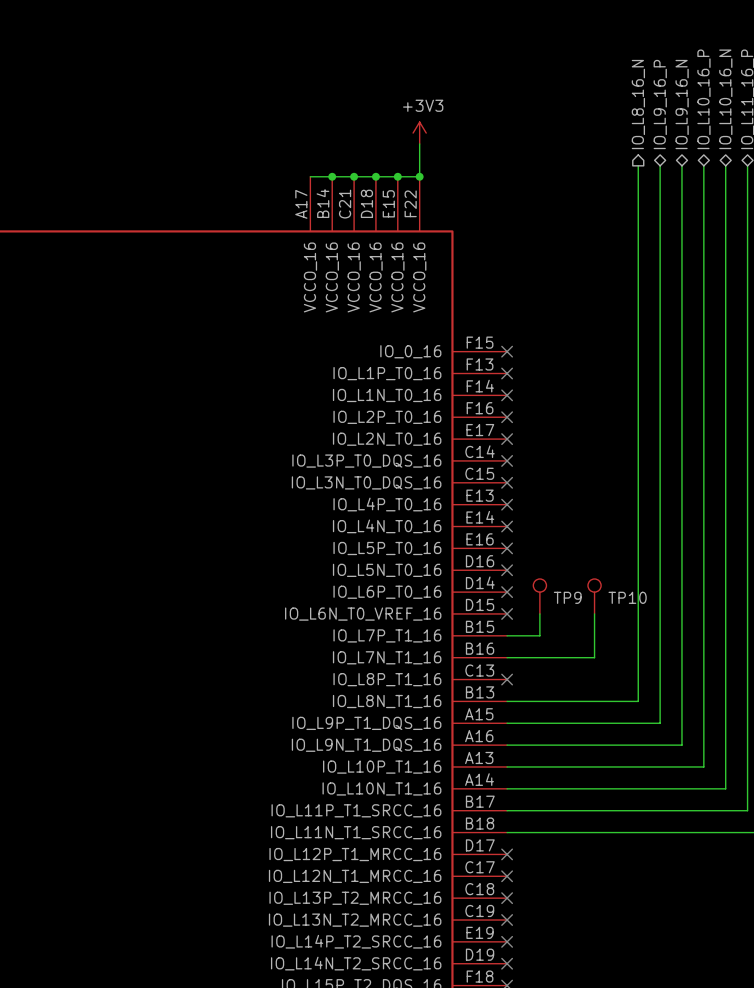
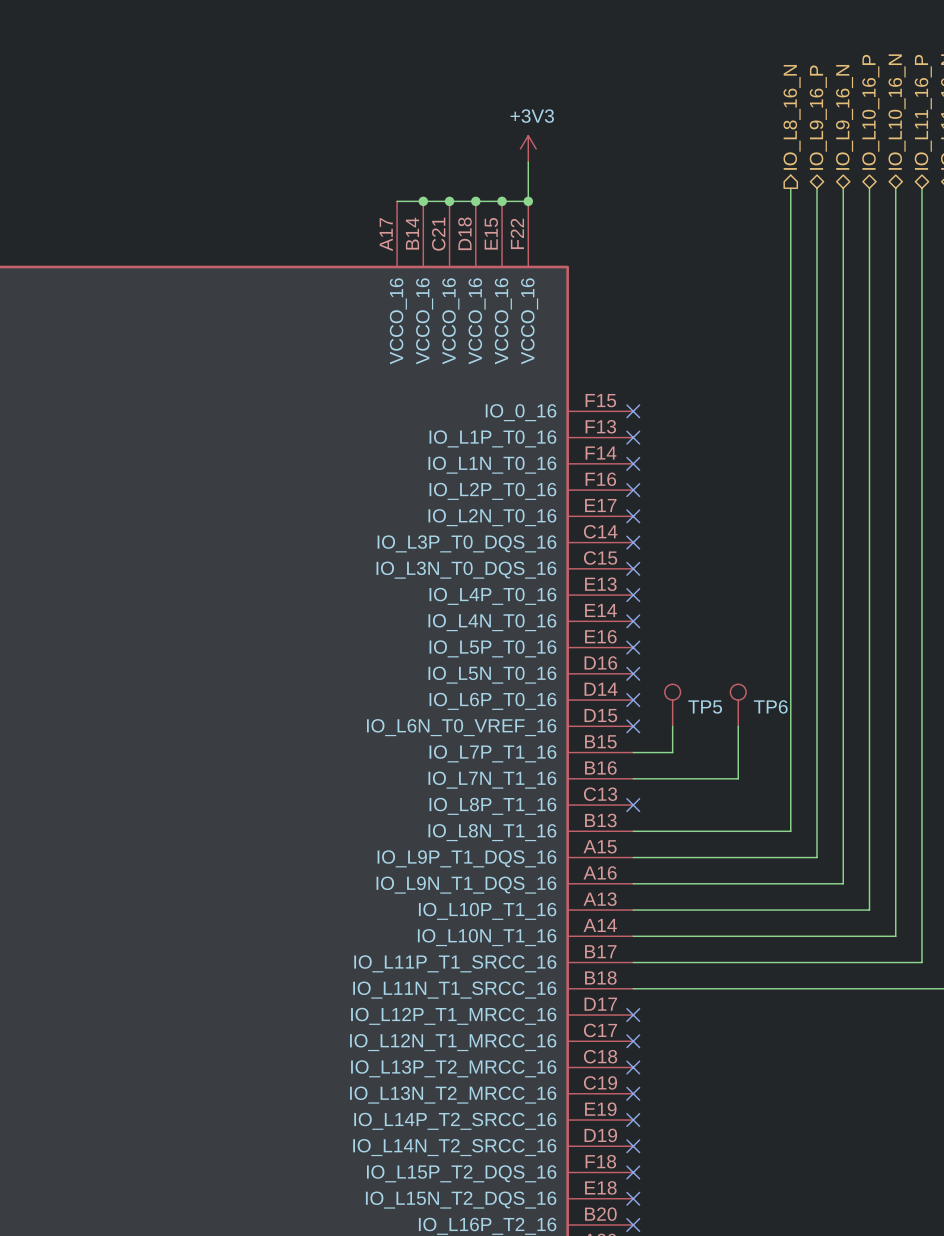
TP9 name: TP9 (567, 597) -> TP5 (705, 707)
TP10 name: TP10 (627, 597) -> TP6 (770, 706)

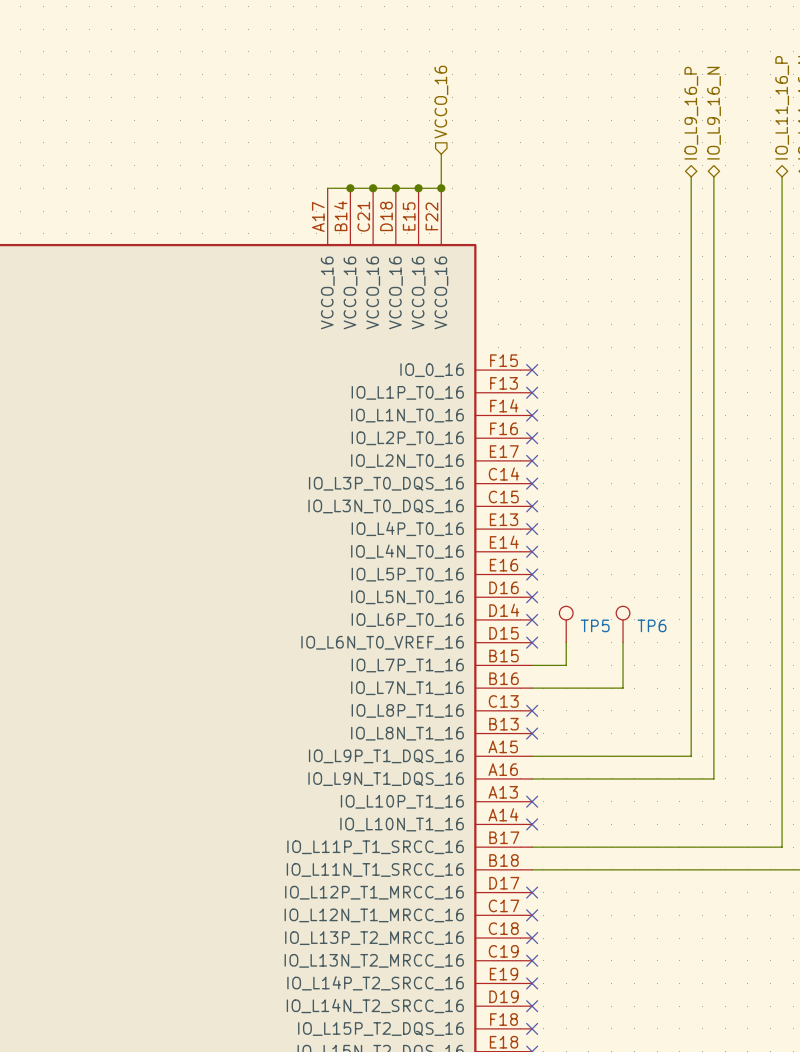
hierarchical label: none -> VCCO_16 (441, 102)
hierarchical label: IO_L10_16_P (870, 112) -> none
hierarchical label: IO_L10_16_N (897, 112) -> none
hierarchical label: IO_L8_16_N (792, 117) -> none
power symbol: +3V3 (528, 148) -> none
wire: (790, 188) (790, 831) (633, 831) -> none
wire: (869, 188) (869, 910) (633, 910) -> none
wire: (895, 188) (895, 936) (633, 936) -> none
no-connect mark: none -> (532, 733)
no-connect mark: none -> (532, 801)
no-connect mark: none -> (532, 824)

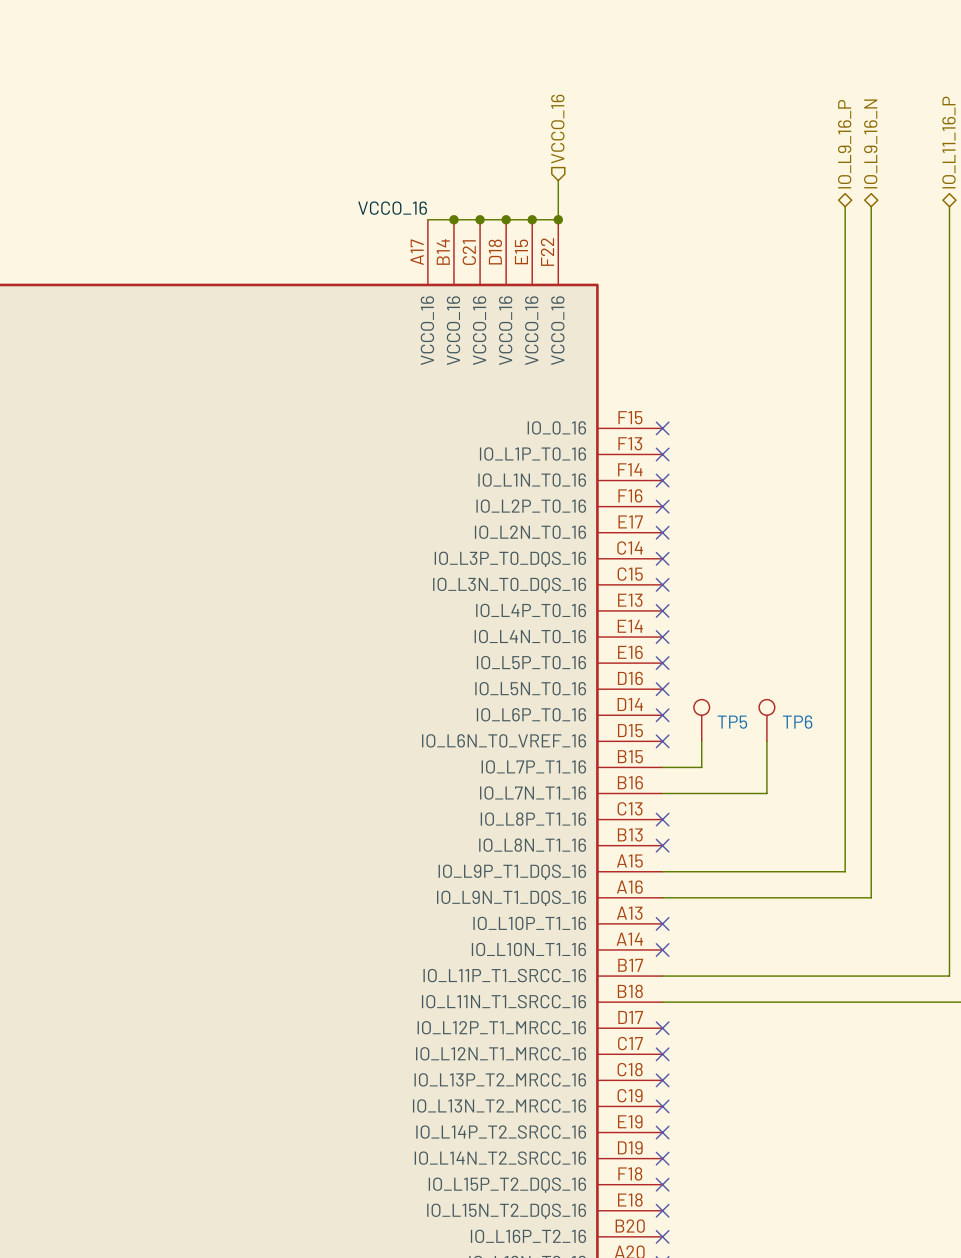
label: none -> VCCO_16 (392, 208)

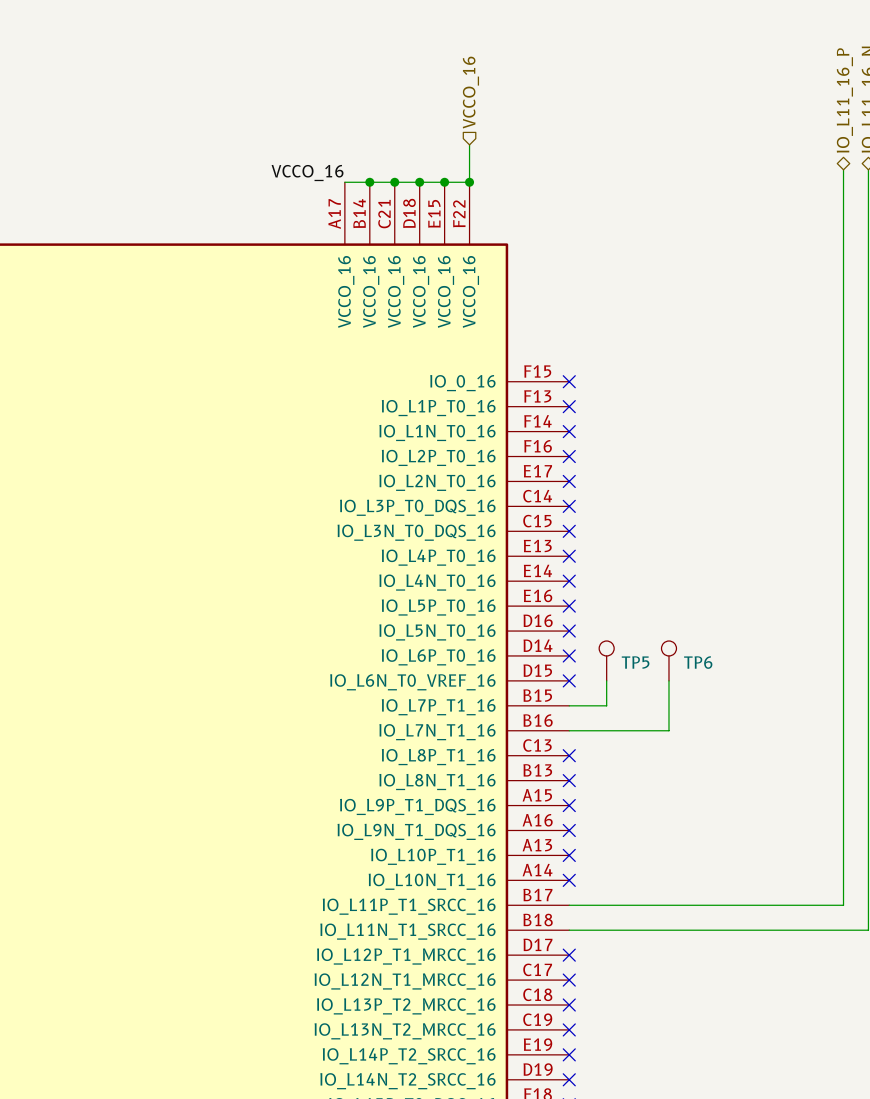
hierarchical label: IO_L9_16_N (870, 143) -> none
hierarchical label: IO_L9_16_P (844, 144) -> none
wire: (845, 206) (845, 871) (662, 871) -> none
wire: (871, 206) (871, 897) (662, 897) -> none
no-connect mark: none -> (569, 805)
no-connect mark: none -> (569, 830)

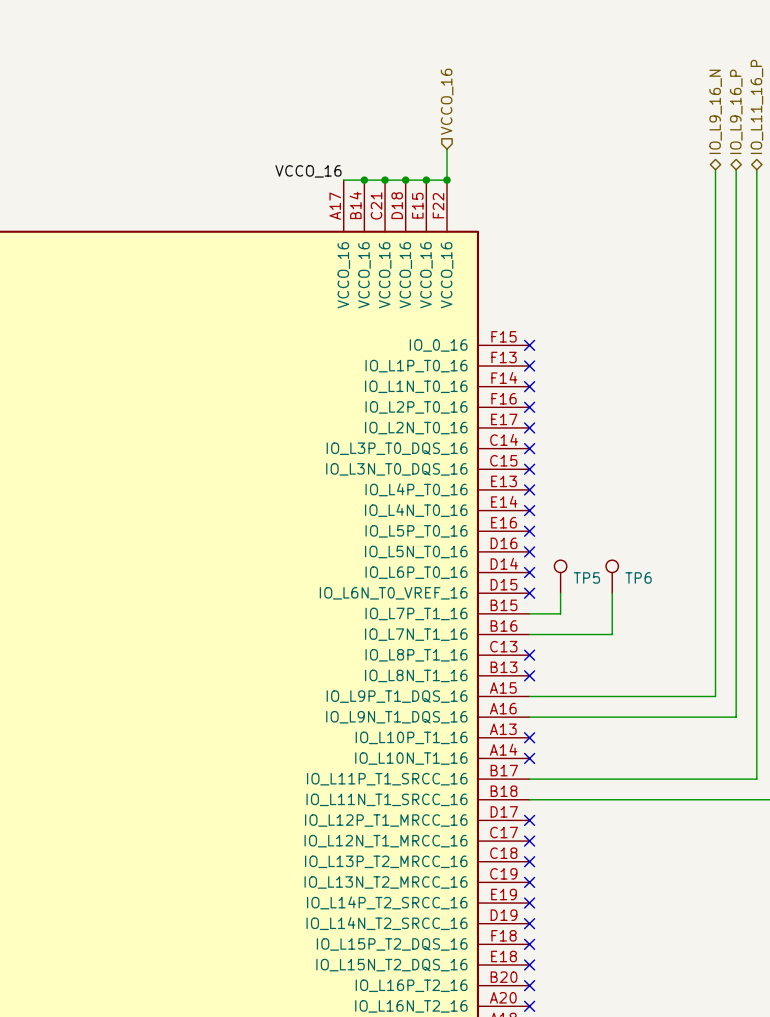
hierarchical label: none -> IO_L9_16_N (715, 111)
hierarchical label: none -> IO_L9_16_P (736, 111)
wire: none -> (715, 169) (715, 696) (529, 696)
wire: none -> (736, 169) (736, 717) (529, 717)
no-connect mark: (569, 805) -> none
no-connect mark: (569, 830) -> none

